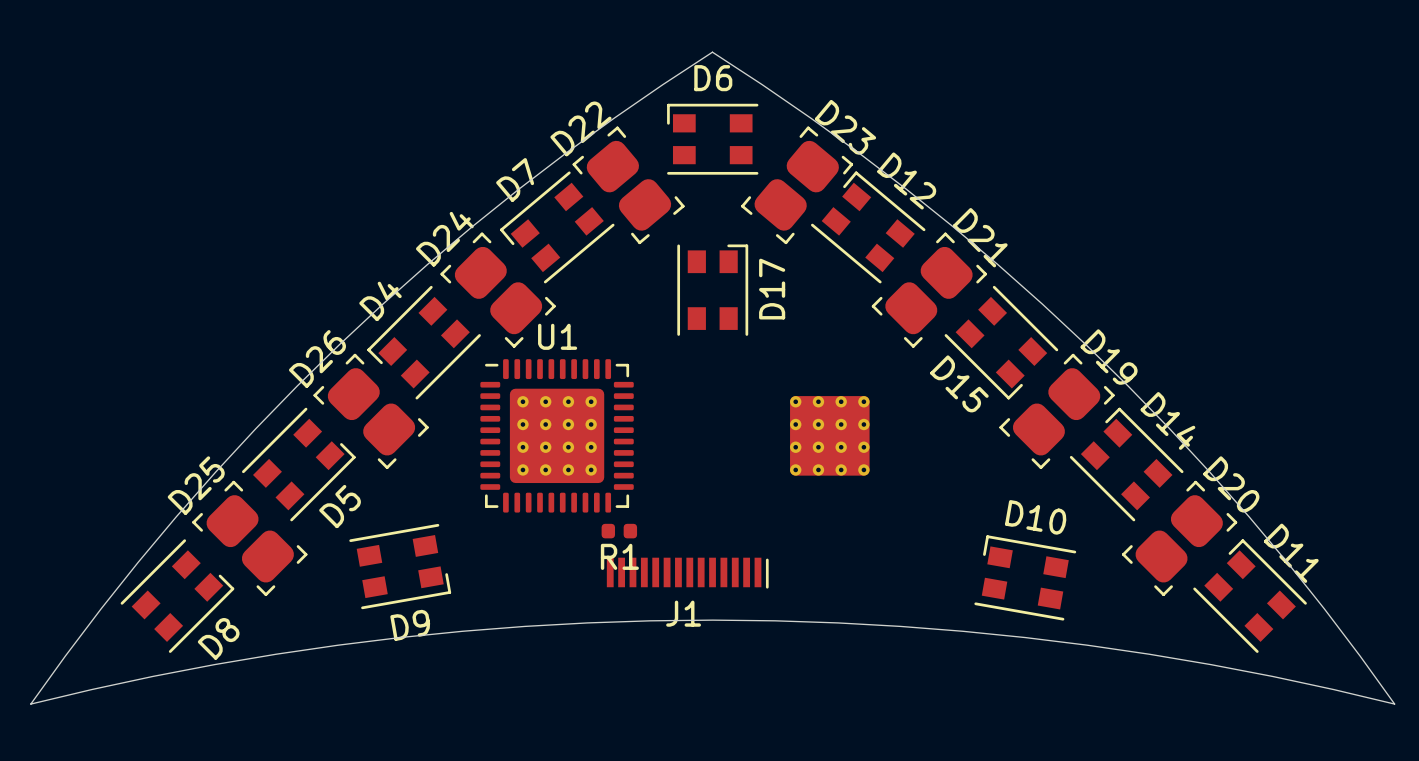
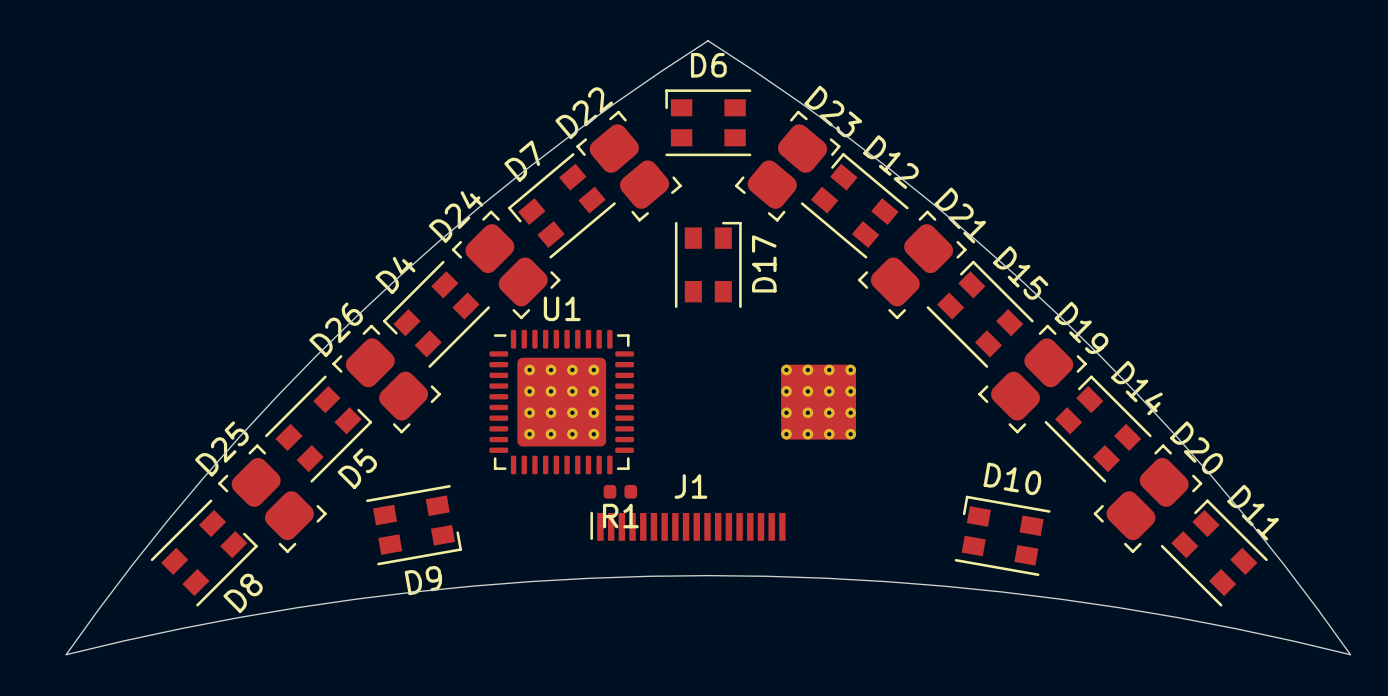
D15 rotation: 0° (1001, 342) -> 180° (980, 314)
J1 footprint: [606, 557, 769, 589] -> [590, 511, 786, 541]
J1 name position: J1 (683, 613) -> J1 (690, 486)

